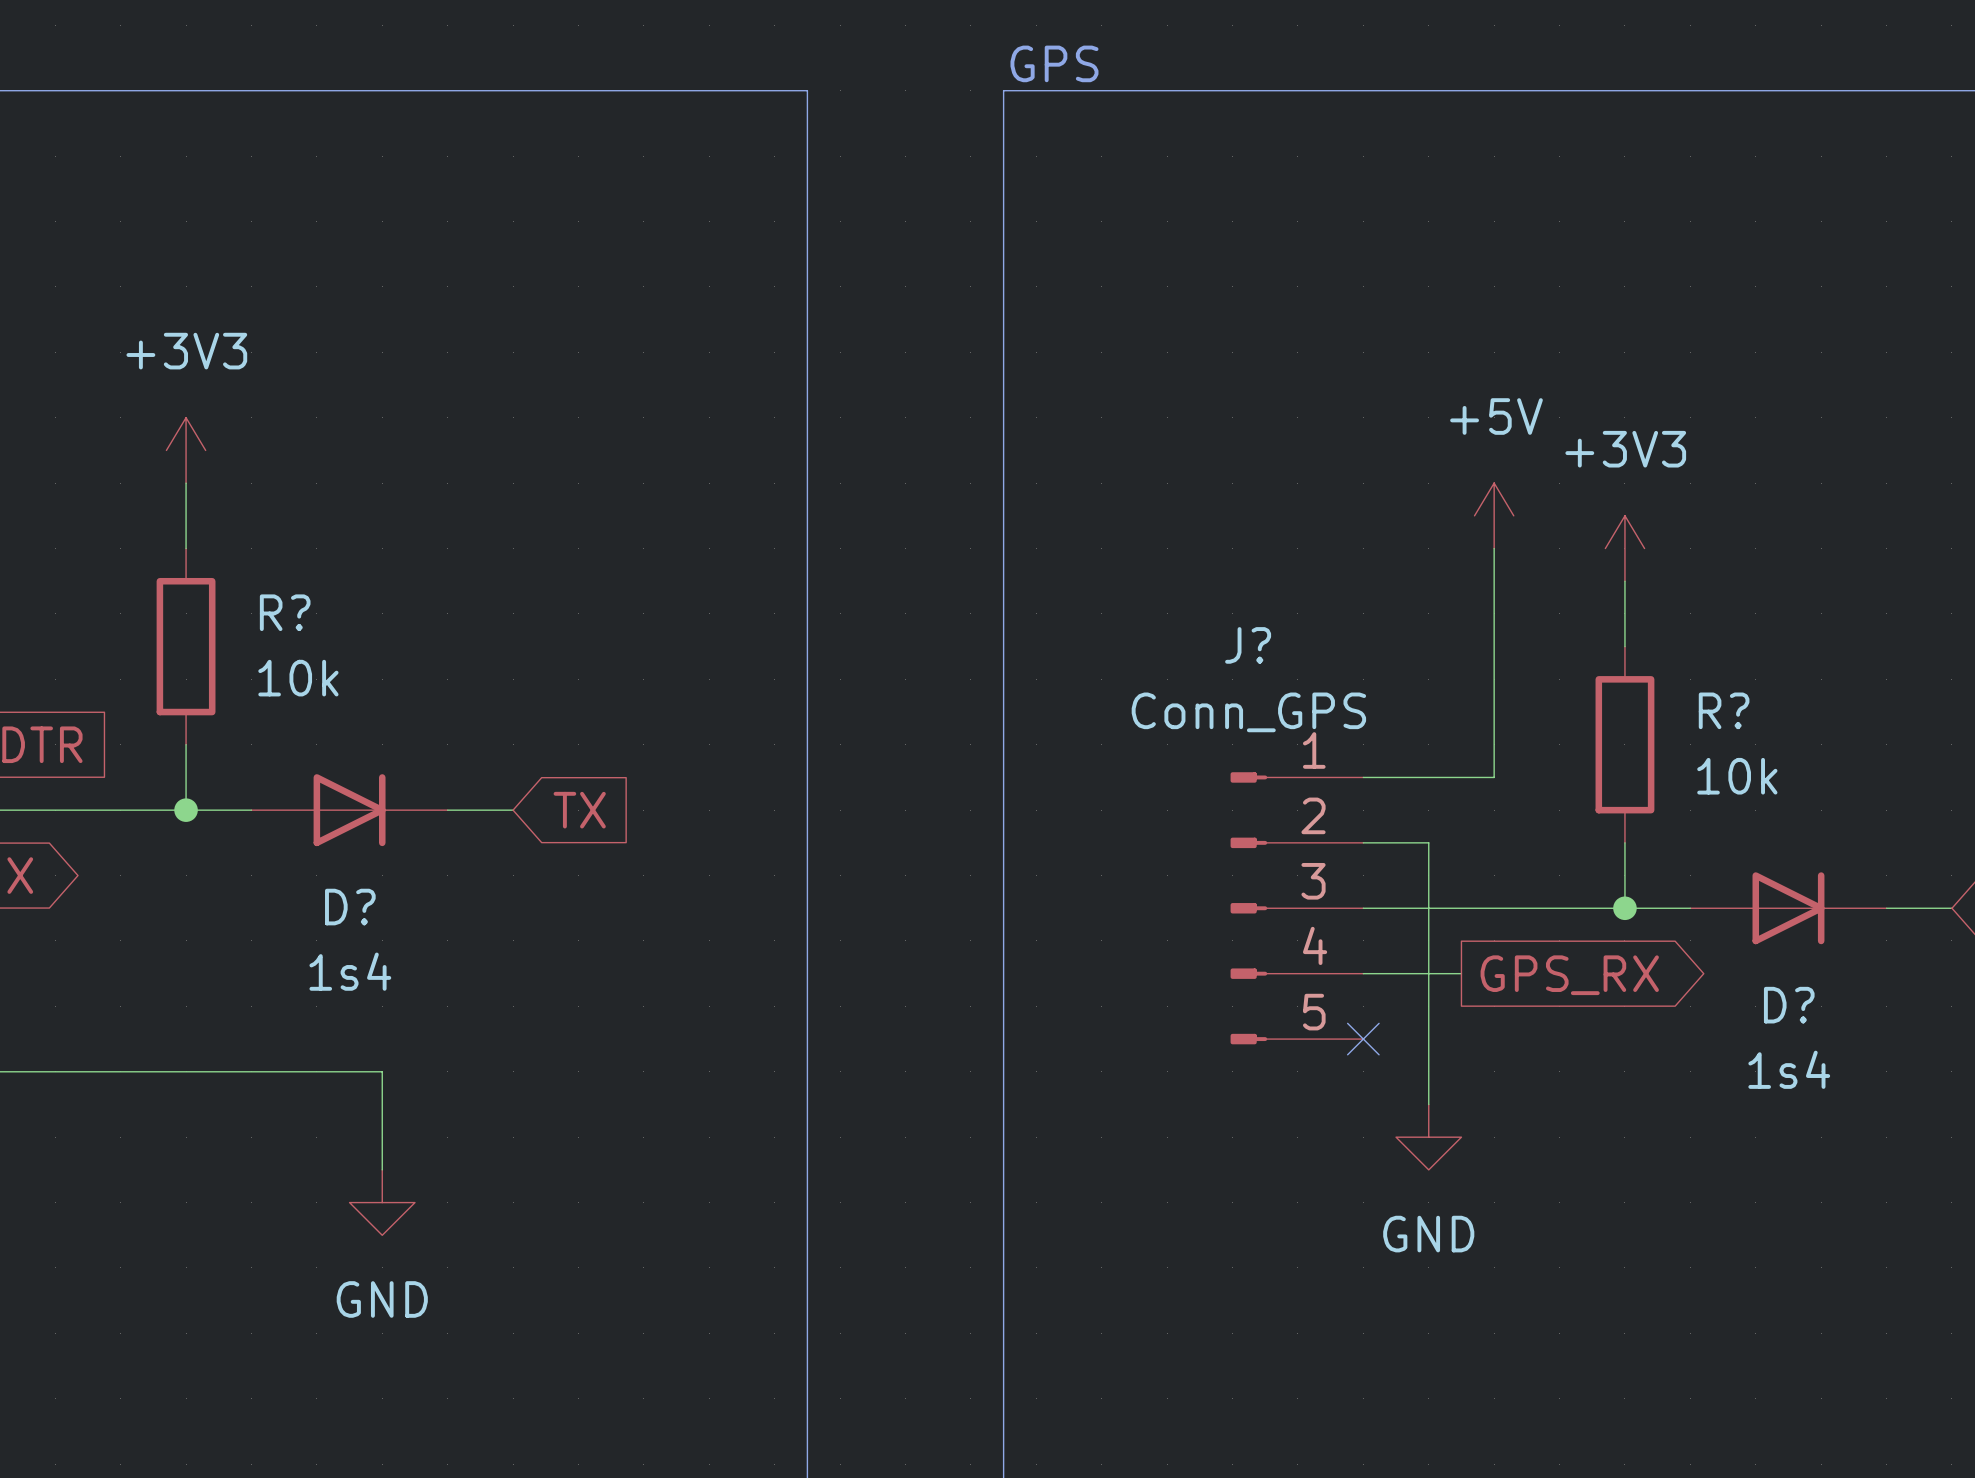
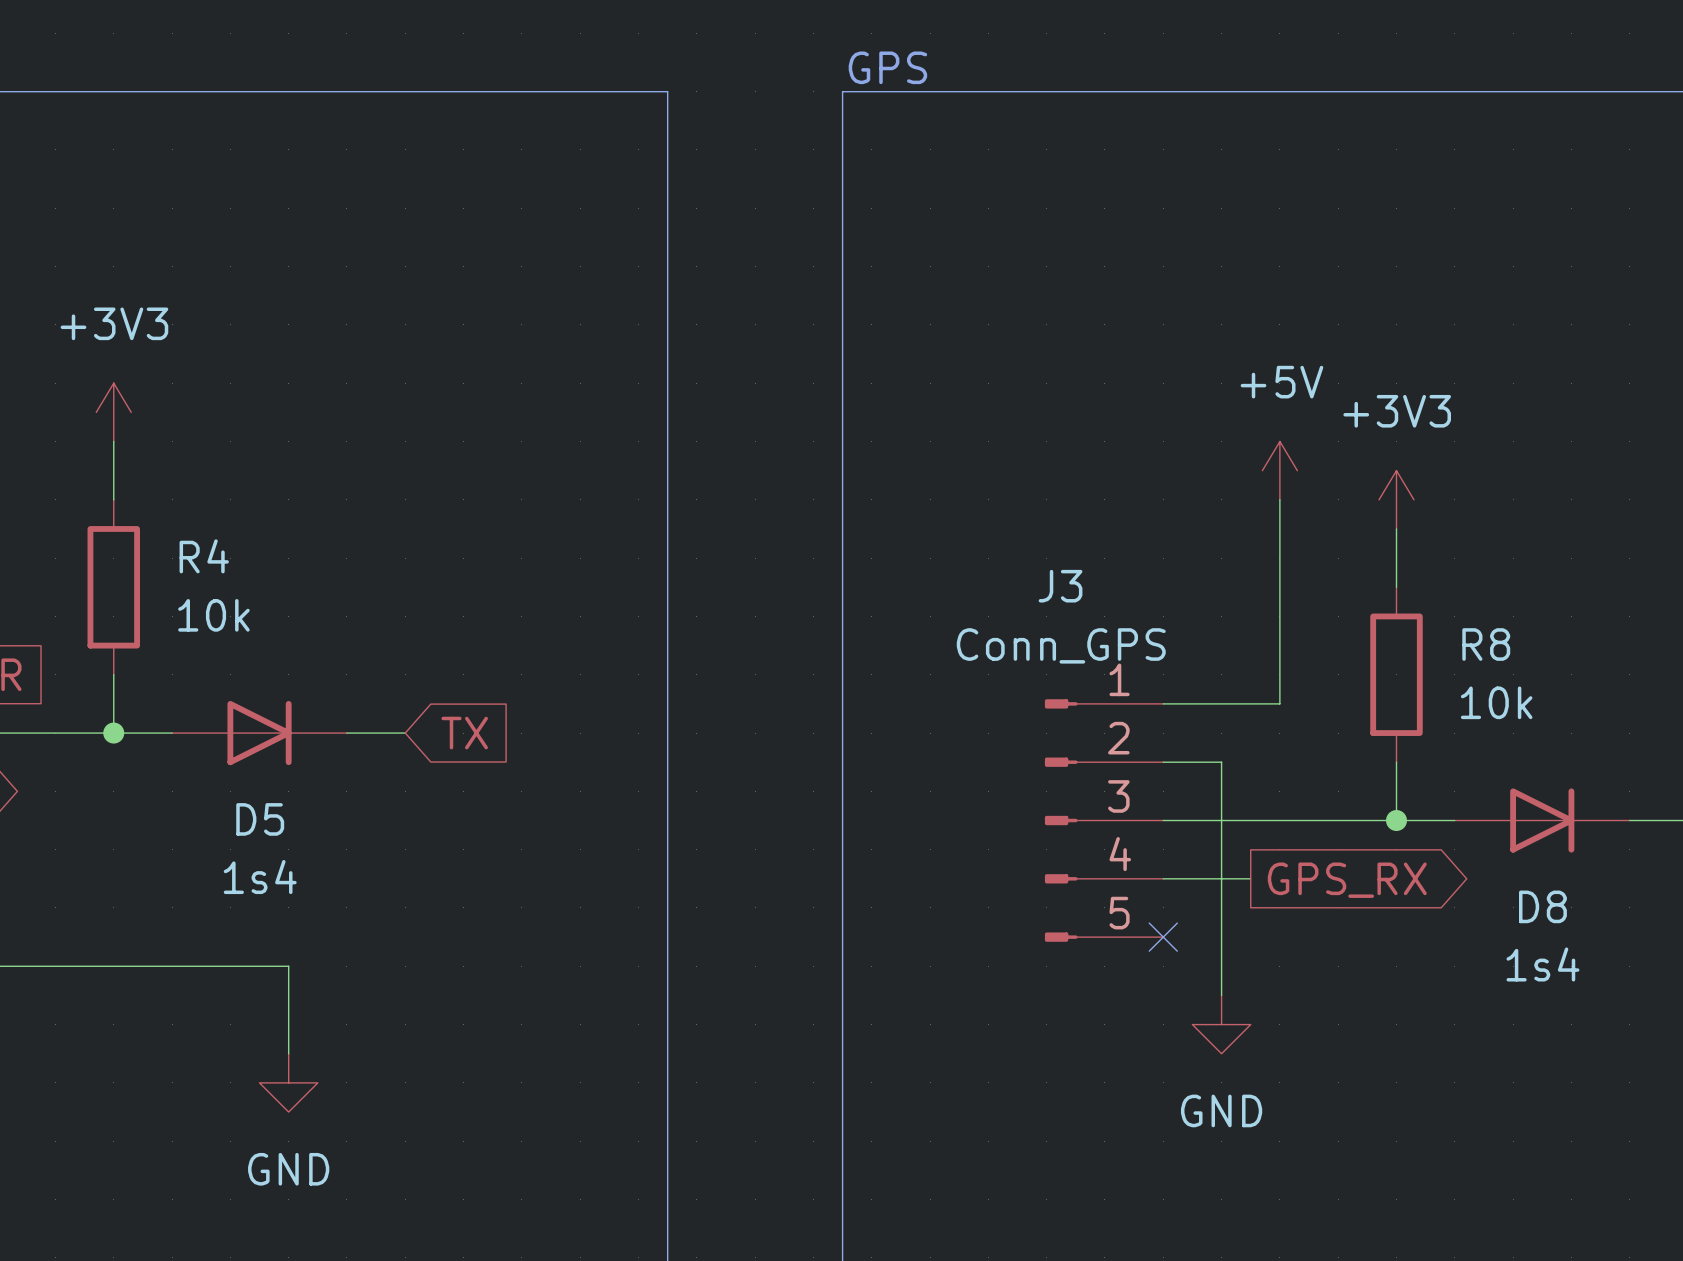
R? name: R? (285, 612) -> R4 (204, 556)
J? name: J? (1248, 645) -> J3 (1060, 586)
R? name: R? (1724, 710) -> R8 (1486, 644)
D? name: D? (350, 907) -> D5 (260, 819)
D? name: D? (1789, 1005) -> D8 (1542, 906)

